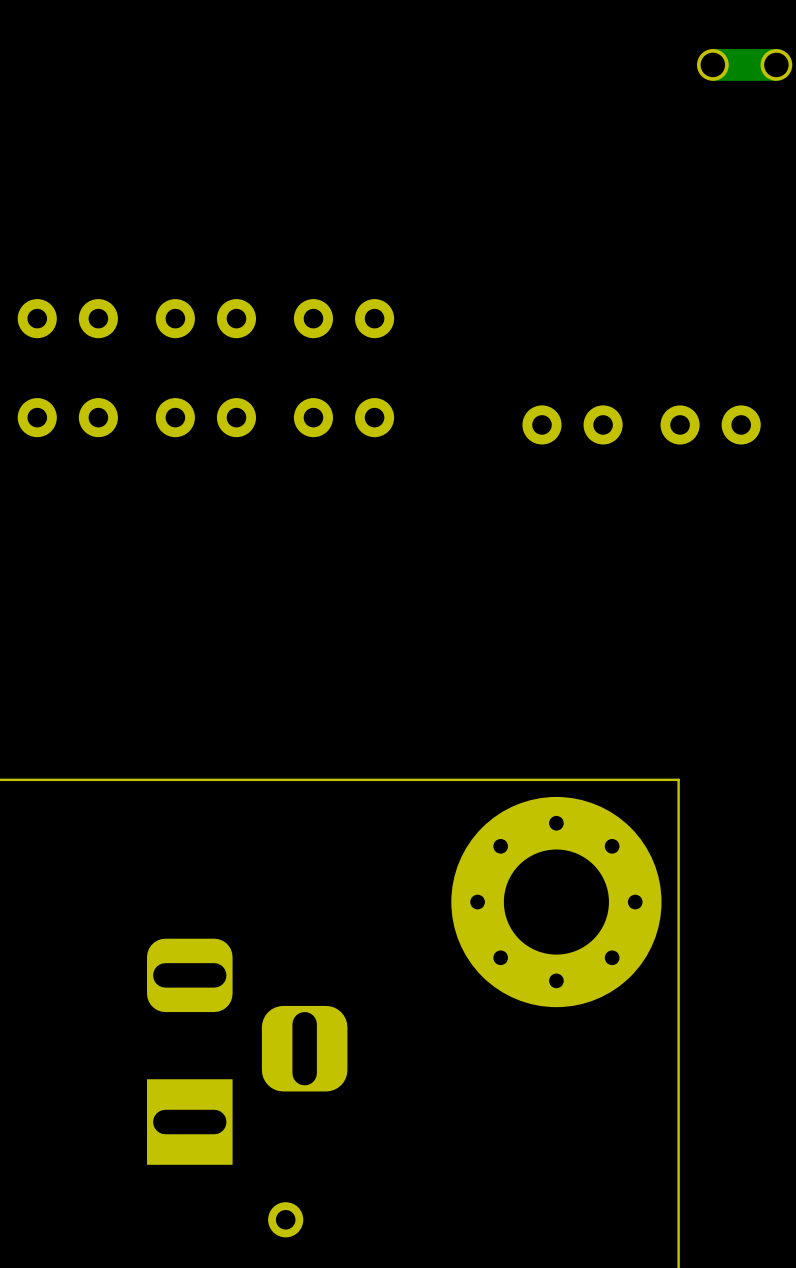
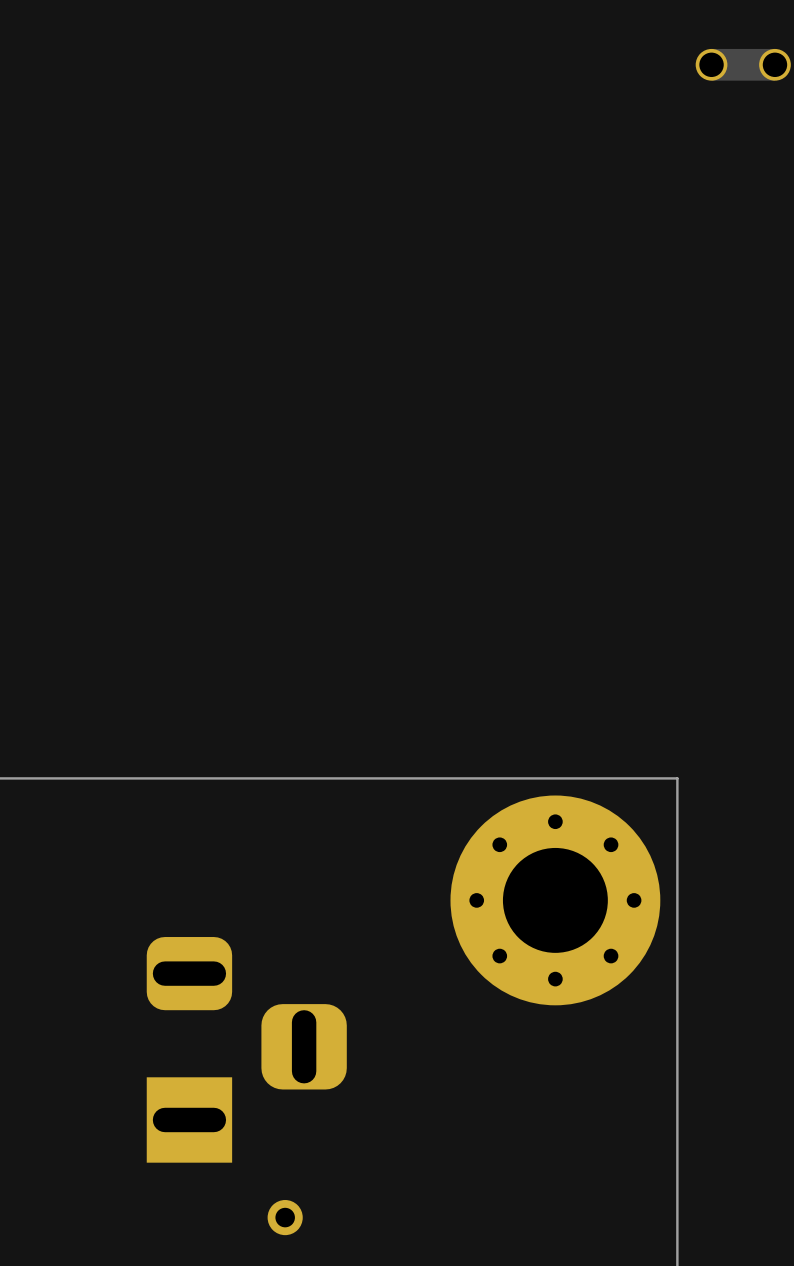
part: (67, 318) -> none
part: (205, 318) -> none
part: (344, 318) -> none
part: (67, 417) -> none
part: (205, 417) -> none
part: (344, 417) -> none
part: (572, 424) -> none
part: (710, 424) -> none

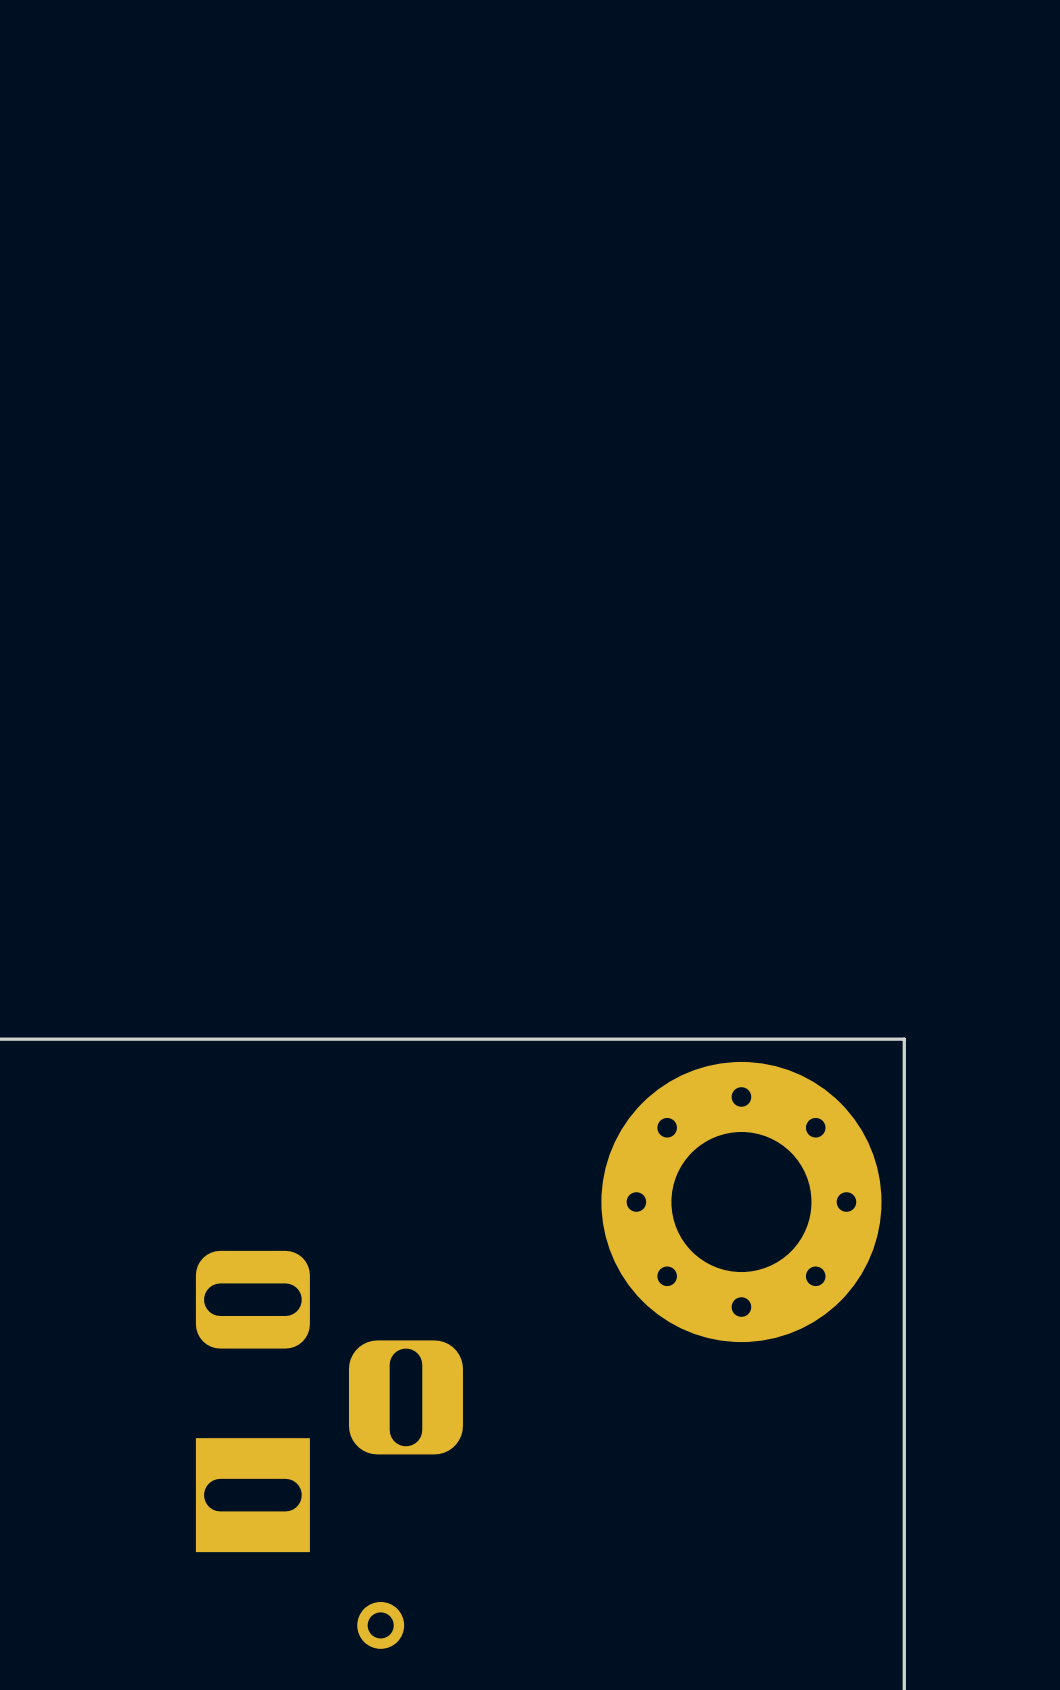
part: (743, 64) -> none

